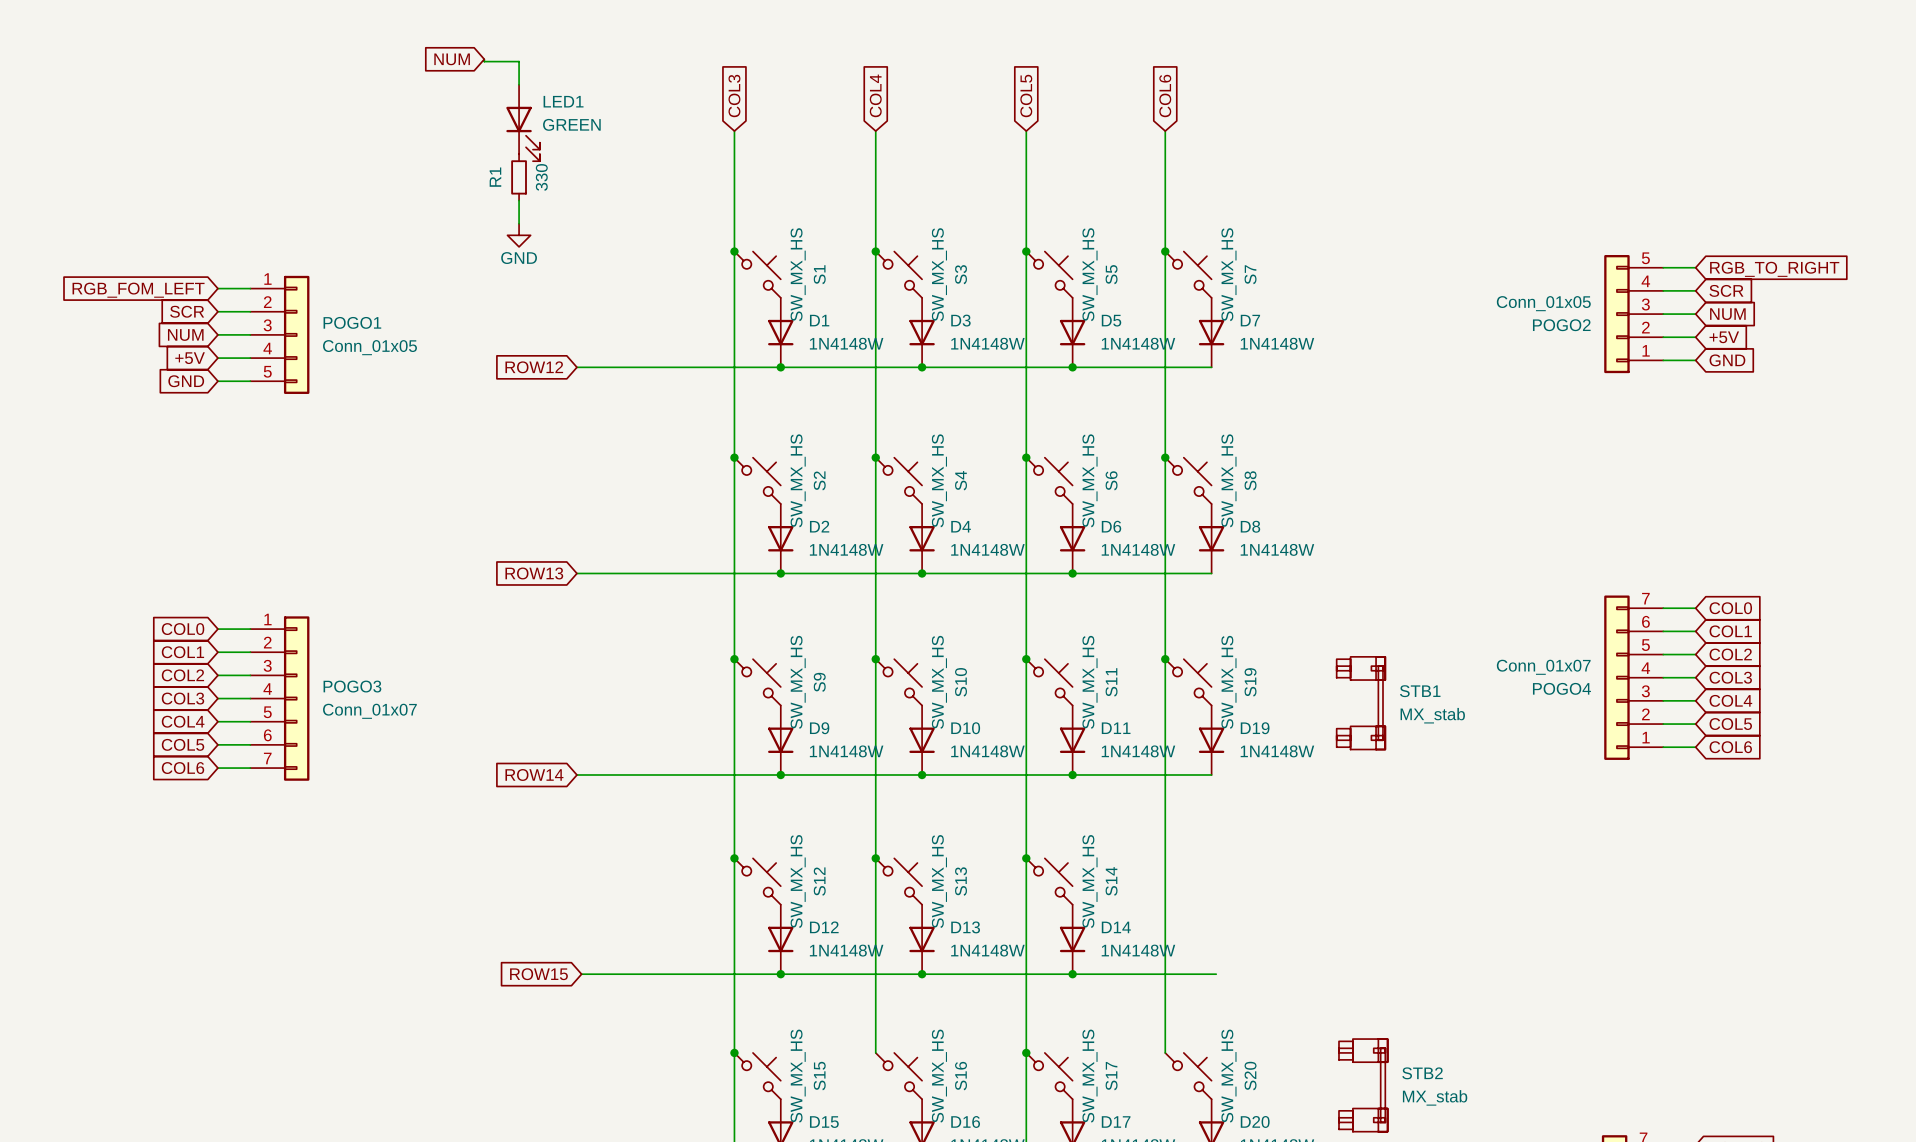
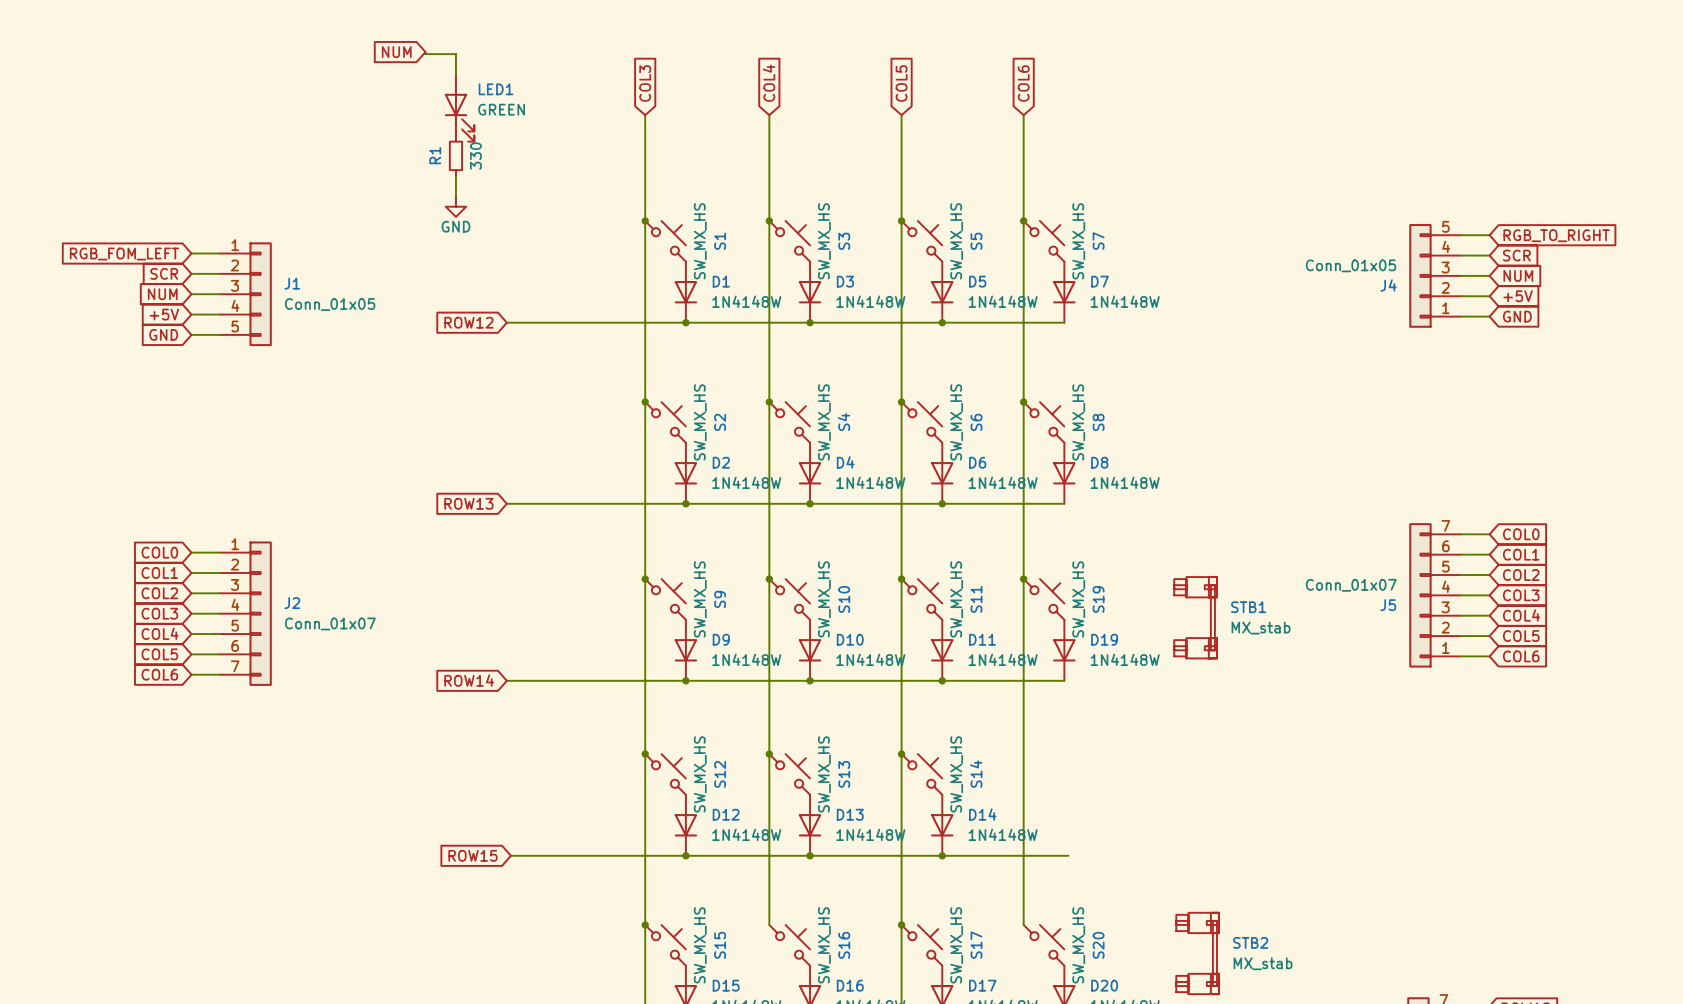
POGO1 name: POGO1 (352, 322) -> J1 (292, 283)
POGO2 name: POGO2 (1561, 325) -> J4 (1388, 285)
POGO3 name: POGO3 (352, 686) -> J2 (292, 603)
POGO4 name: POGO4 (1561, 688) -> J5 (1388, 605)

